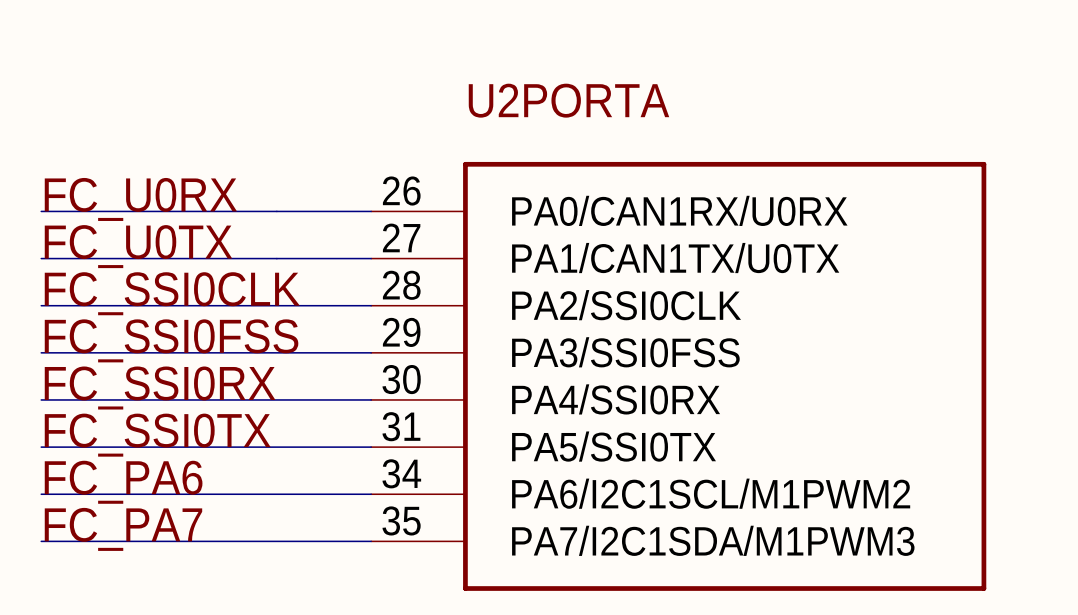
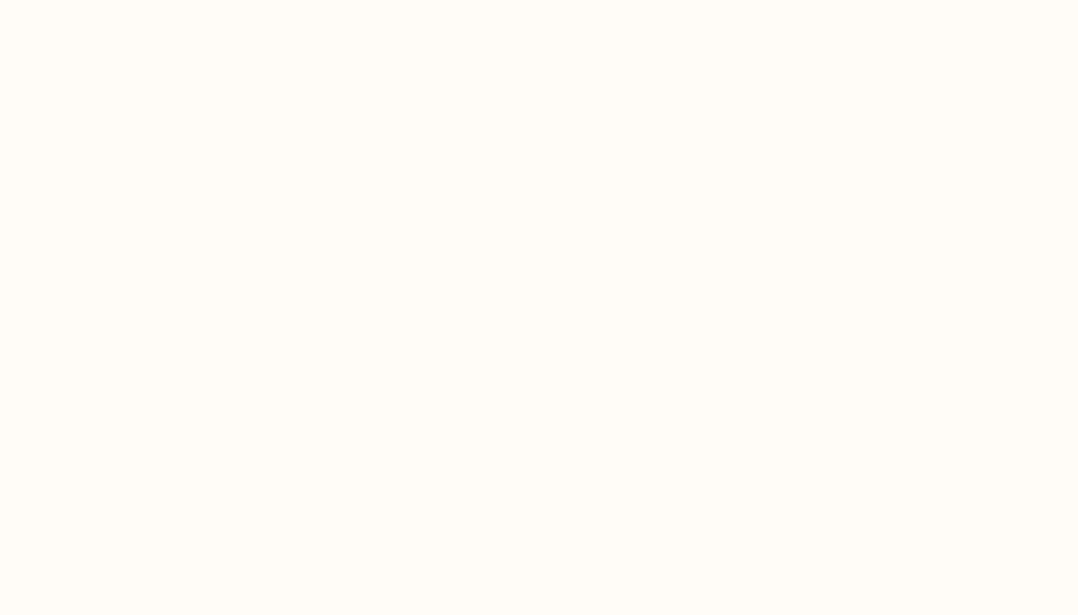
label: FC_U0RX (140, 199) -> none
wire: (41, 211) (371, 211) -> none
label: FC_U0TX (138, 246) -> none
wire: (41, 258) (371, 258) -> none
label: FC_SSI0CLK (172, 293) -> none
wire: (41, 305) (371, 305) -> none
label: FC_SSI0FSS (171, 340) -> none
wire: (41, 352) (371, 352) -> none
U2PORTA: (678, 376) -> none
label: FC_SSI0RX (160, 388) -> none
wire: (41, 399) (371, 399) -> none
label: FC_SSI0TX (157, 435) -> none
wire: (41, 447) (371, 447) -> none
label: FC_PA6 (123, 482) -> none
wire: (41, 494) (371, 494) -> none
label: FC_PA7 (123, 529) -> none
wire: (41, 541) (371, 541) -> none

